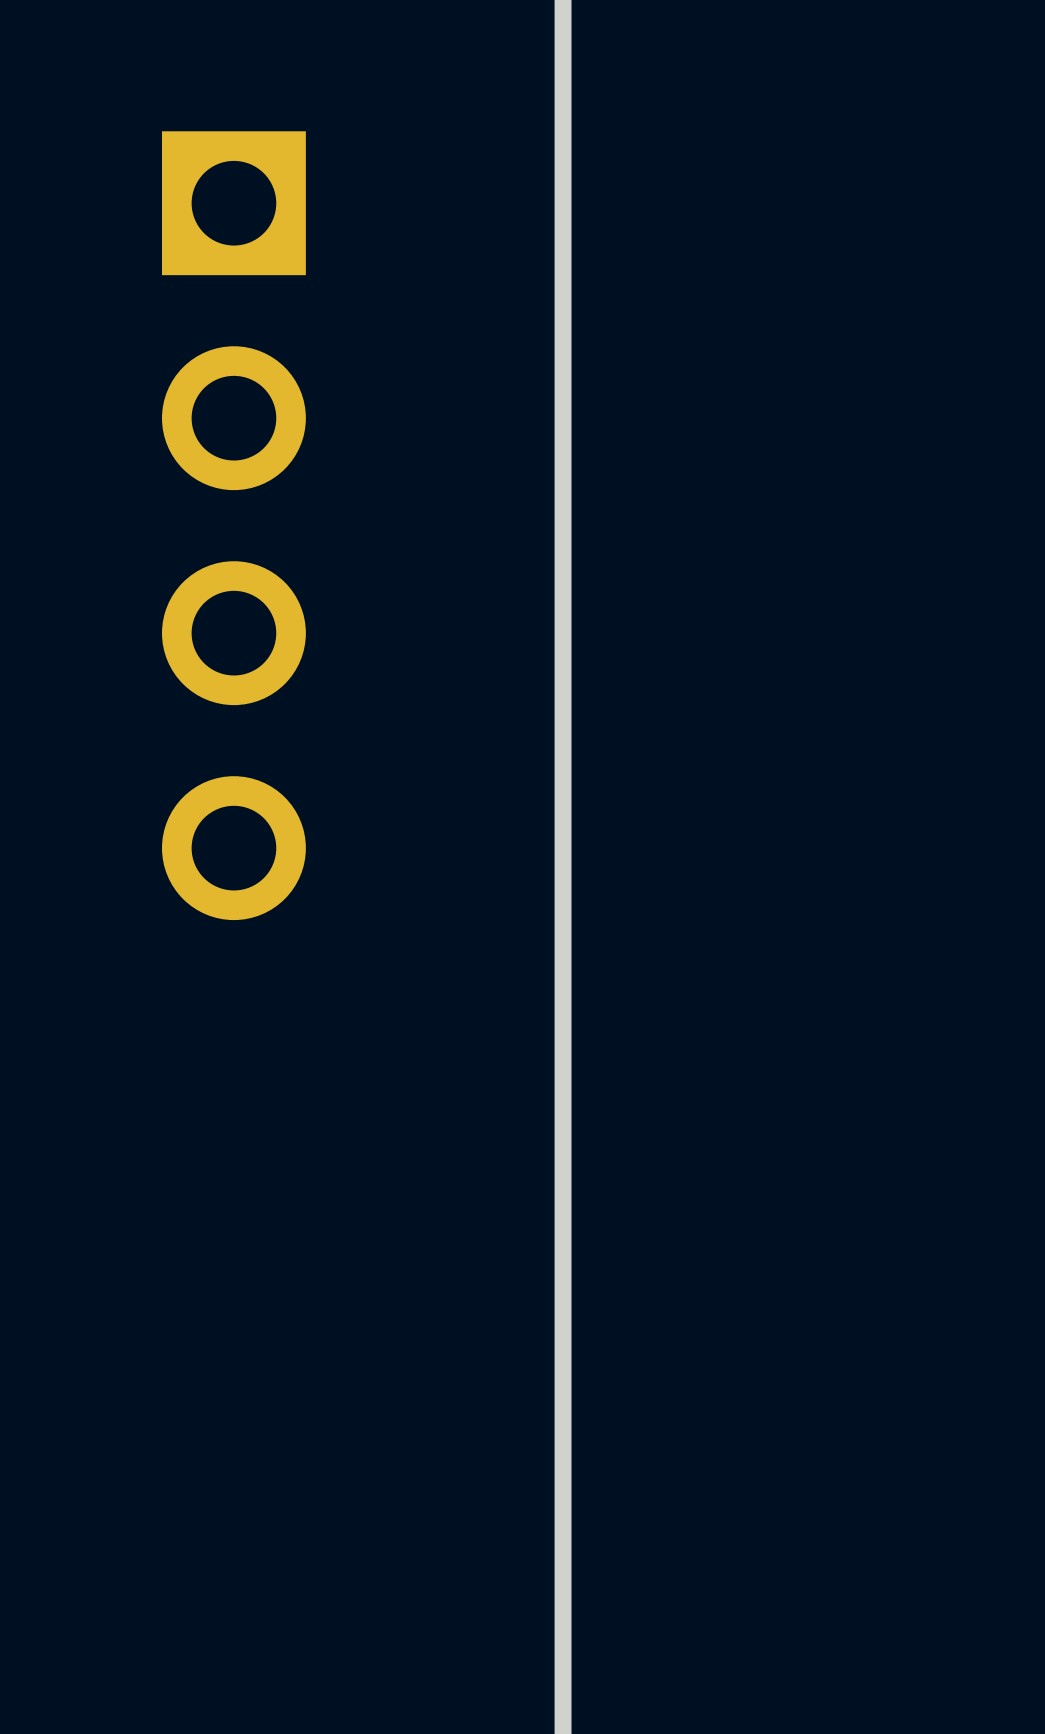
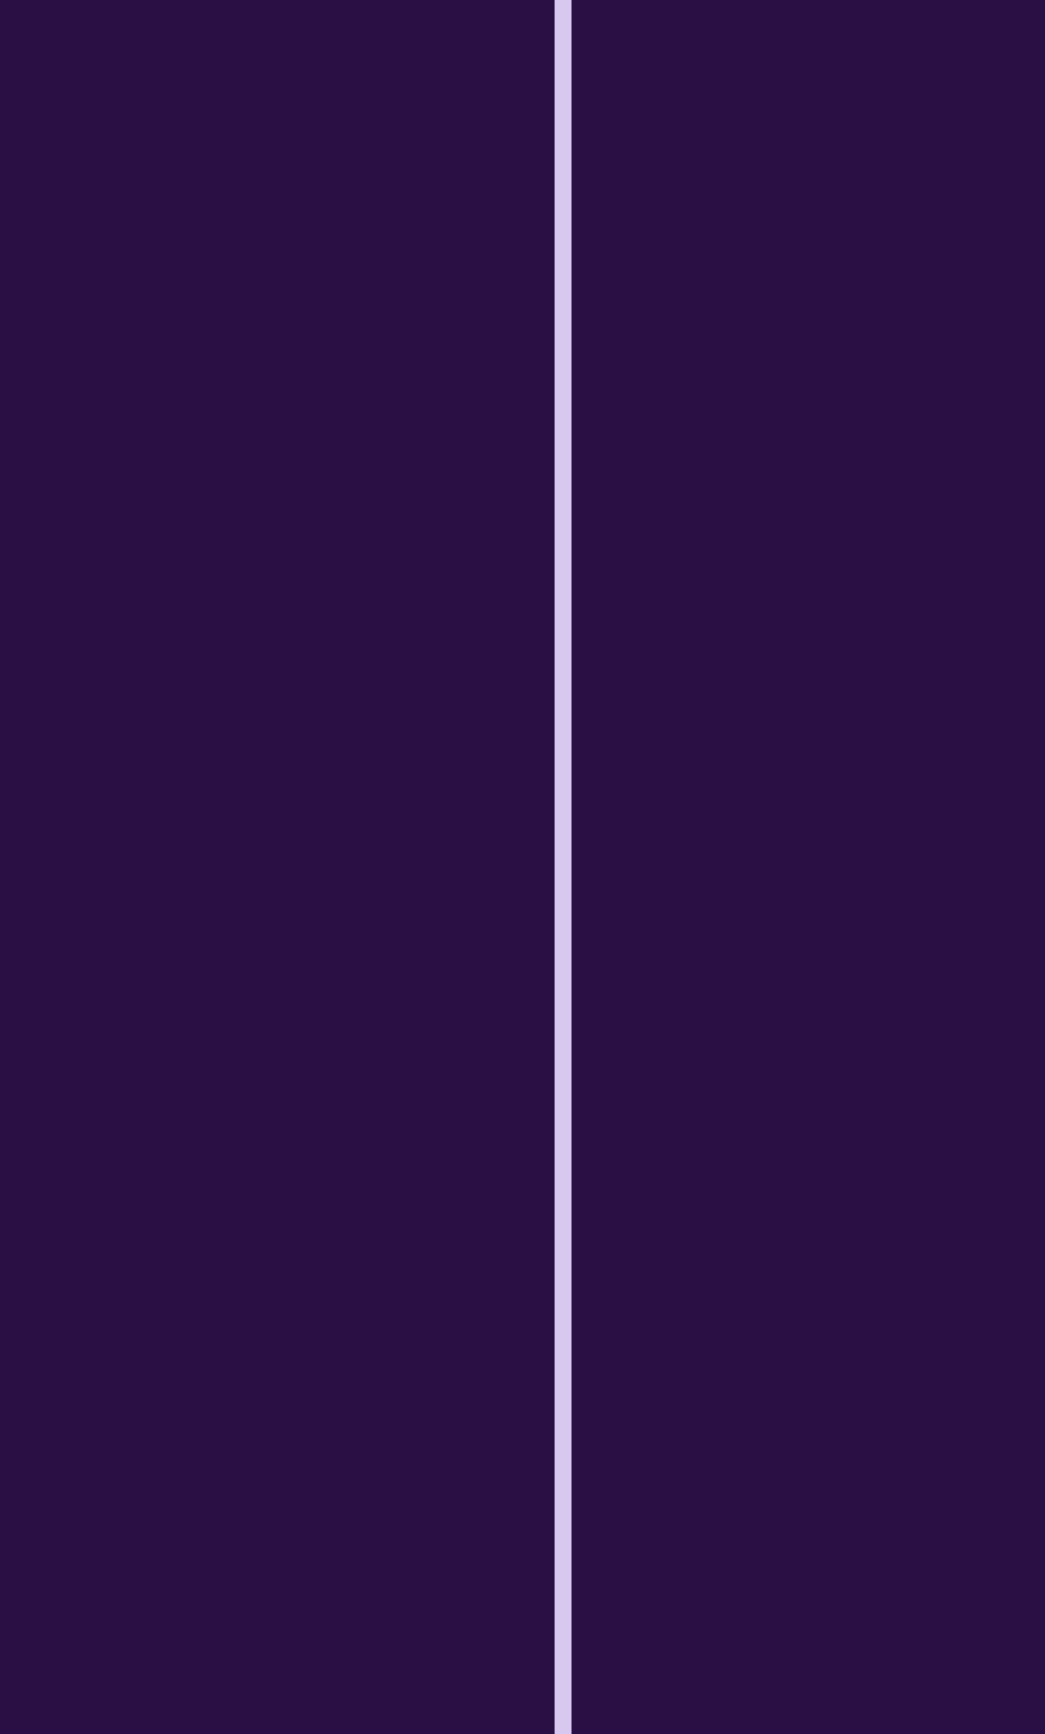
part: (233, 525) -> none

